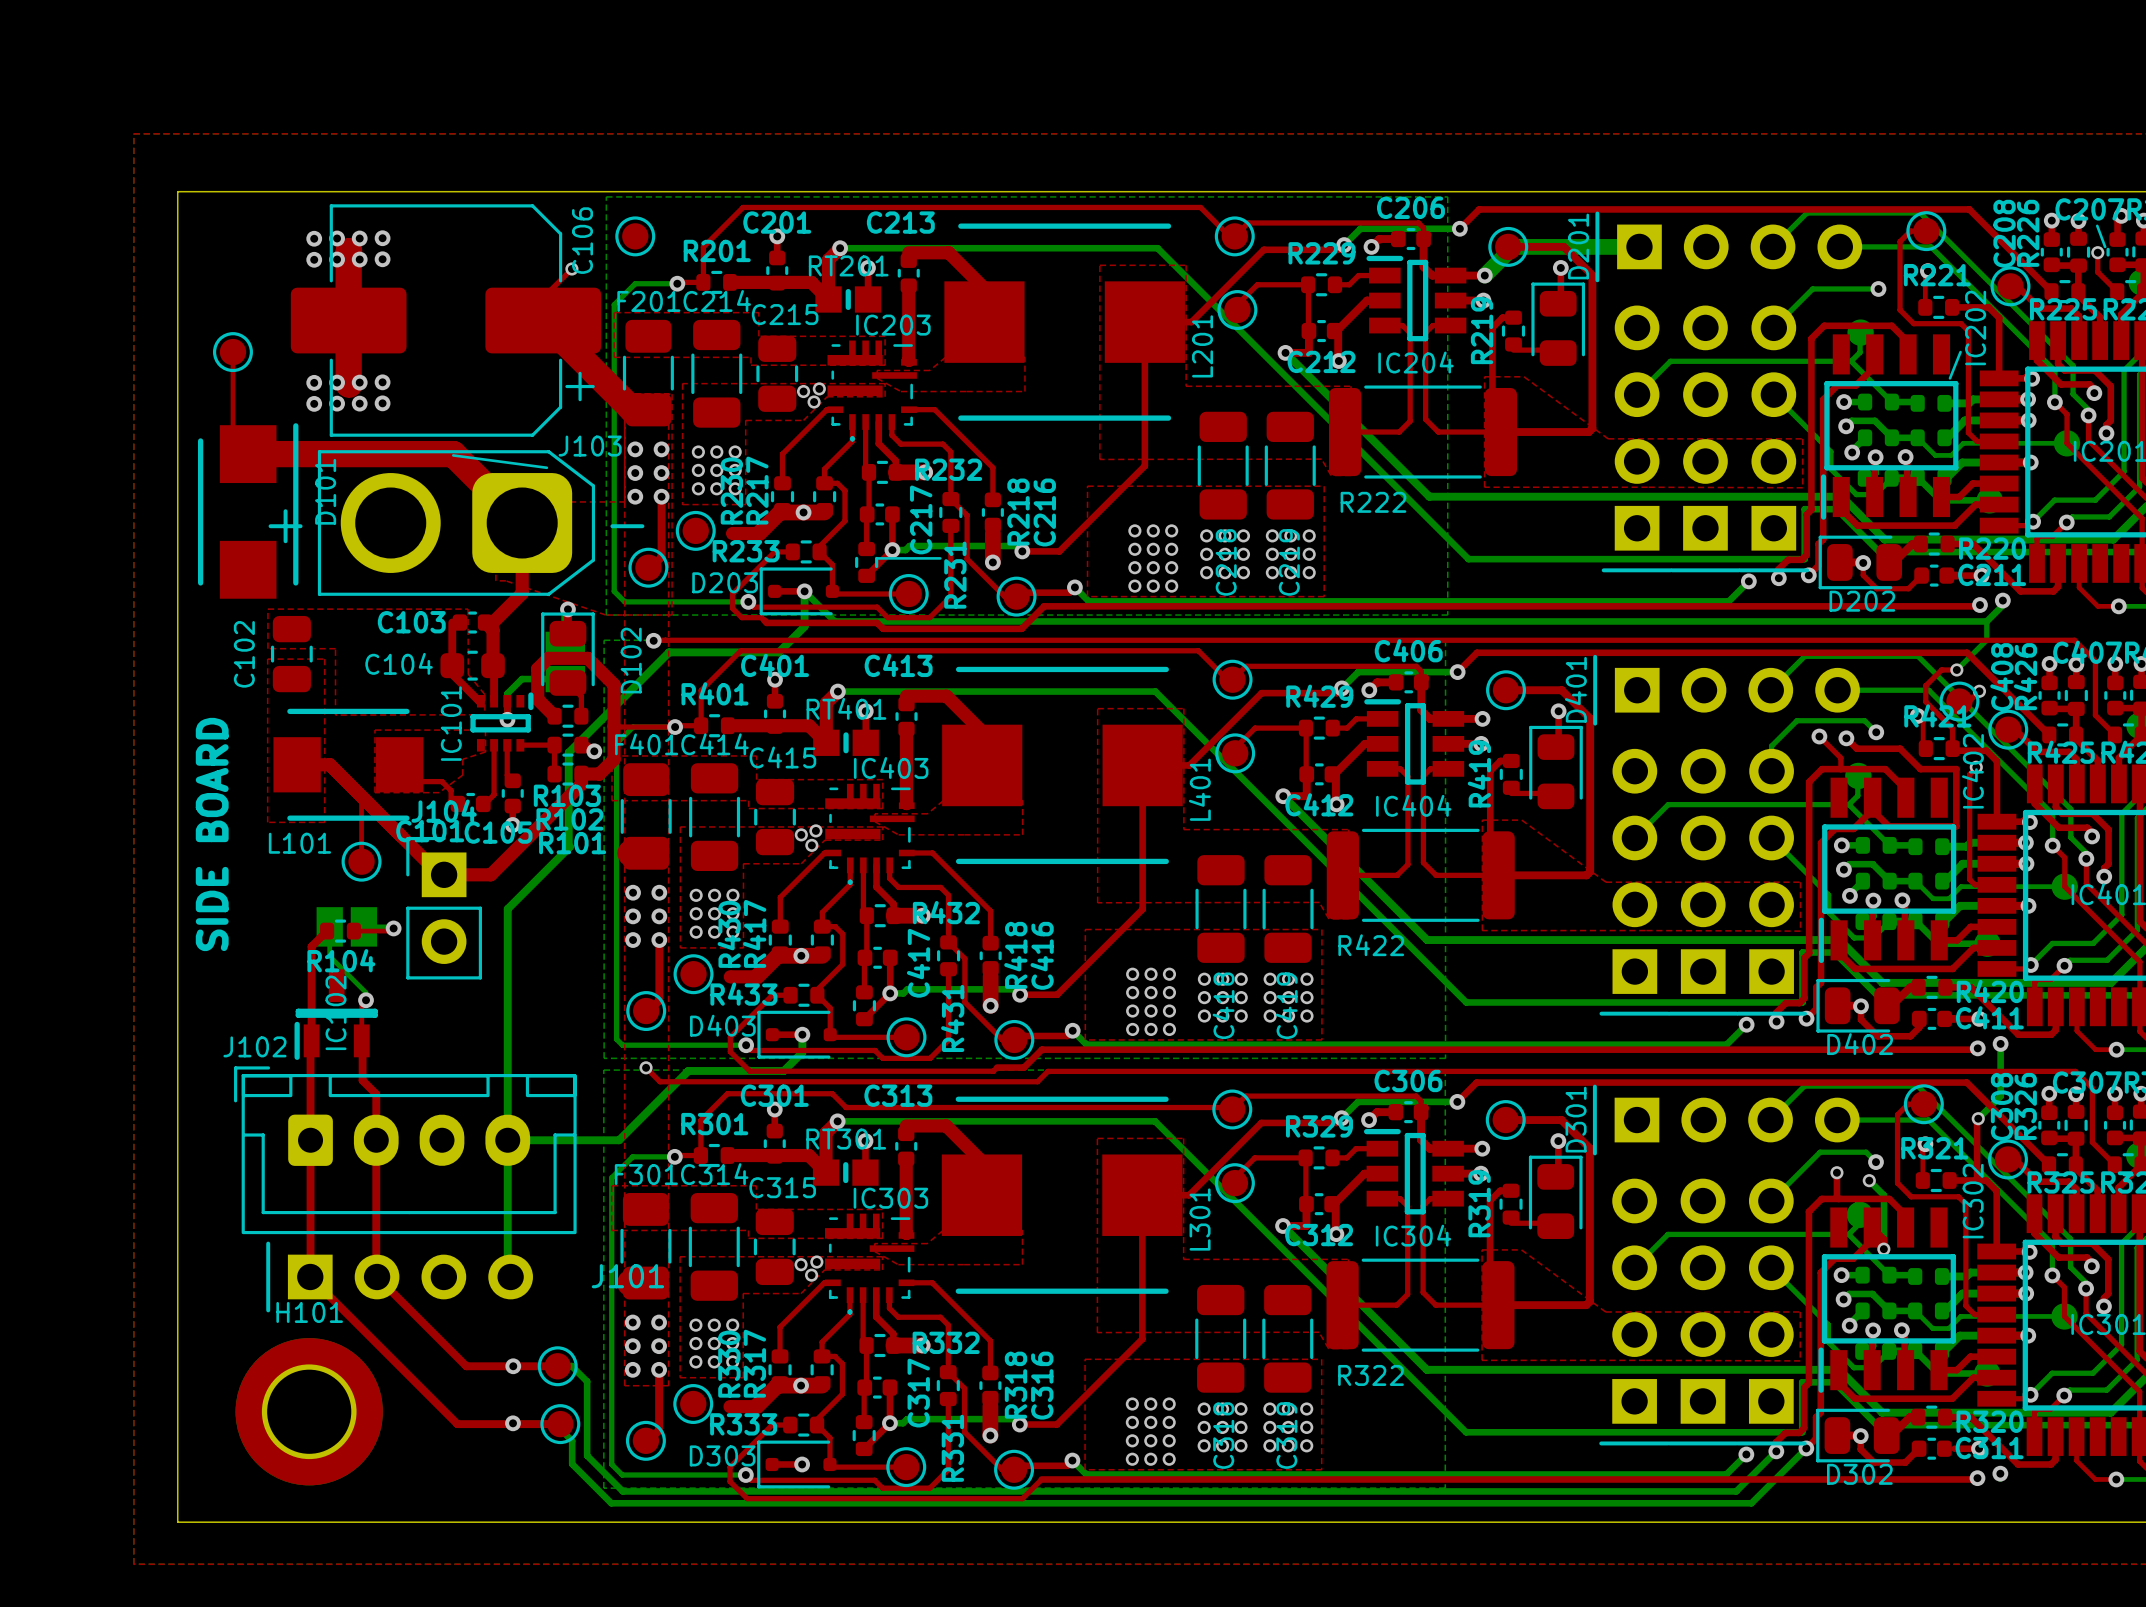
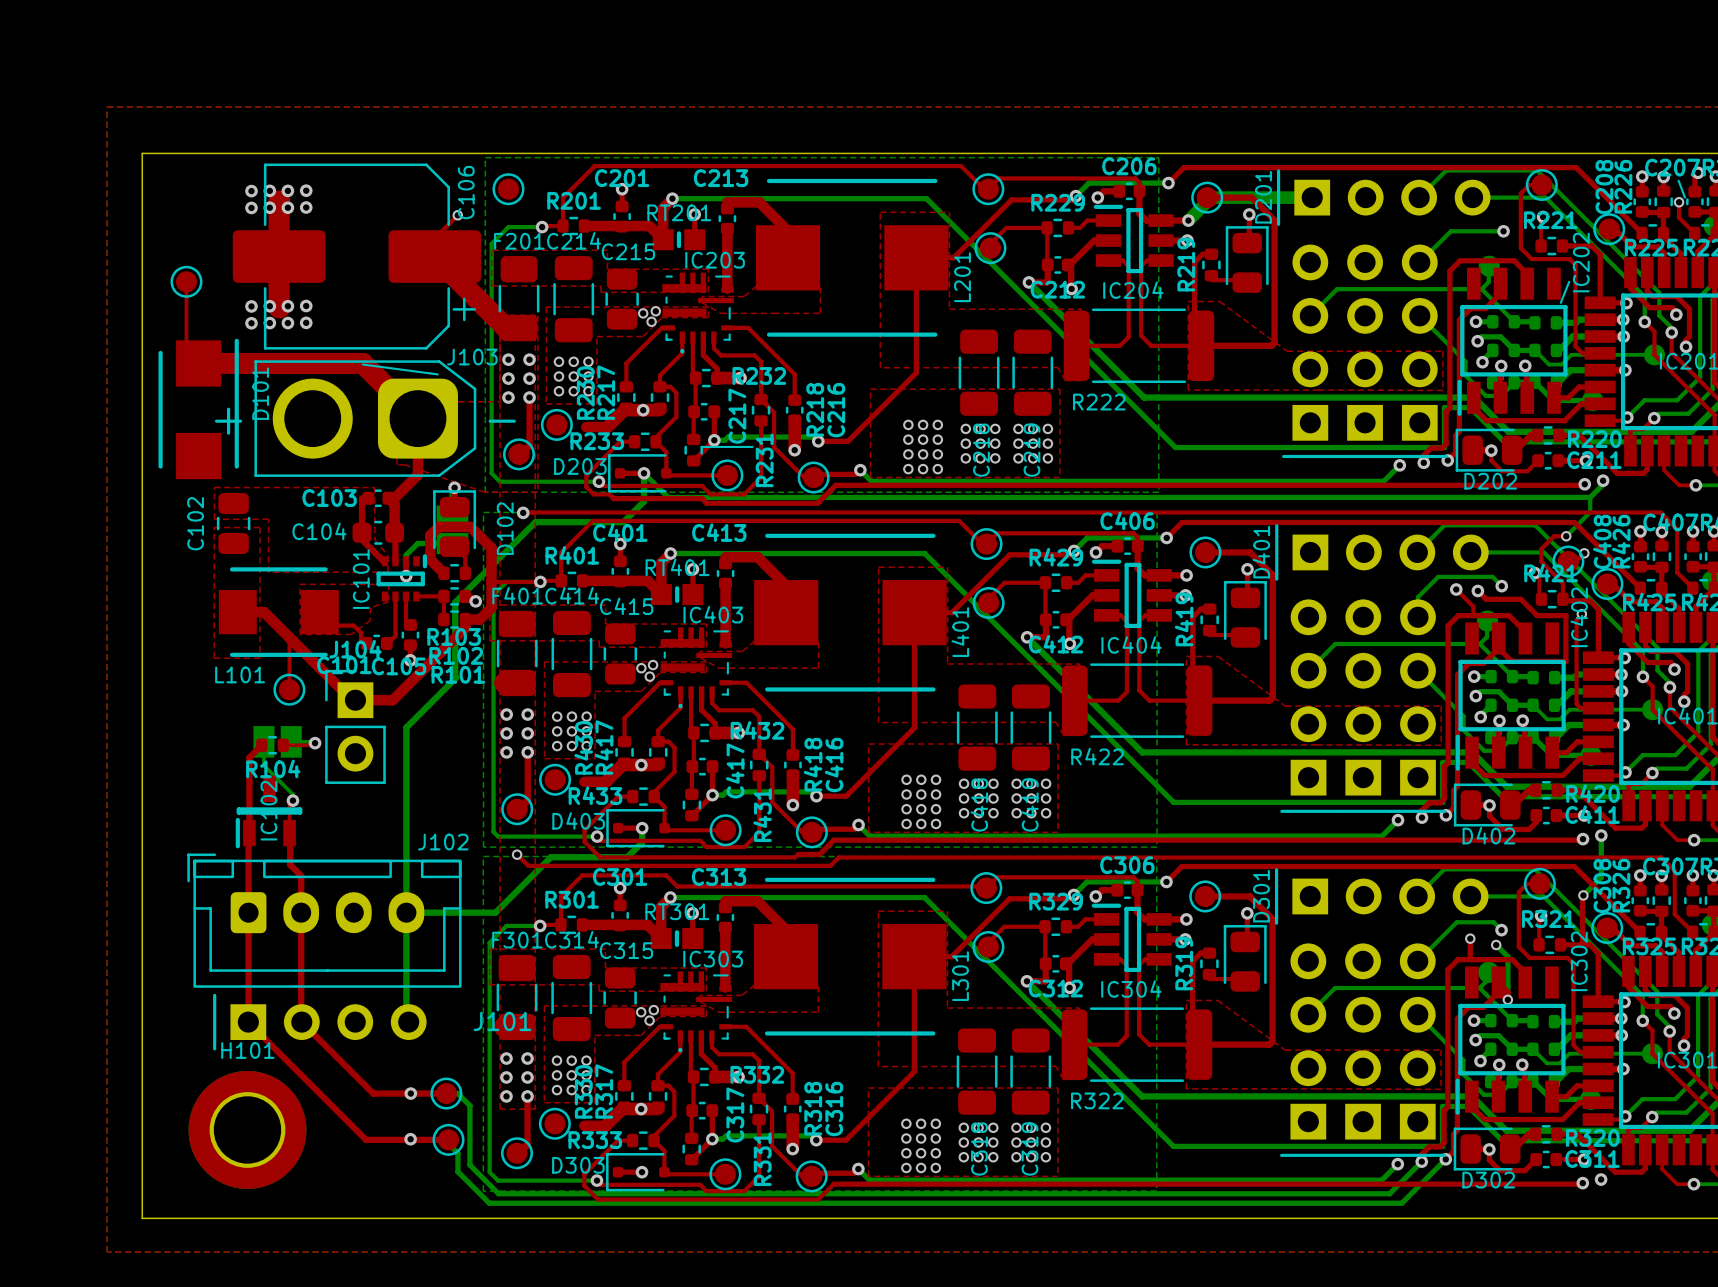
text: SIDE BOARD (212, 834) -> none
J102 name position: J102 (254, 1046) -> J102 (443, 842)

